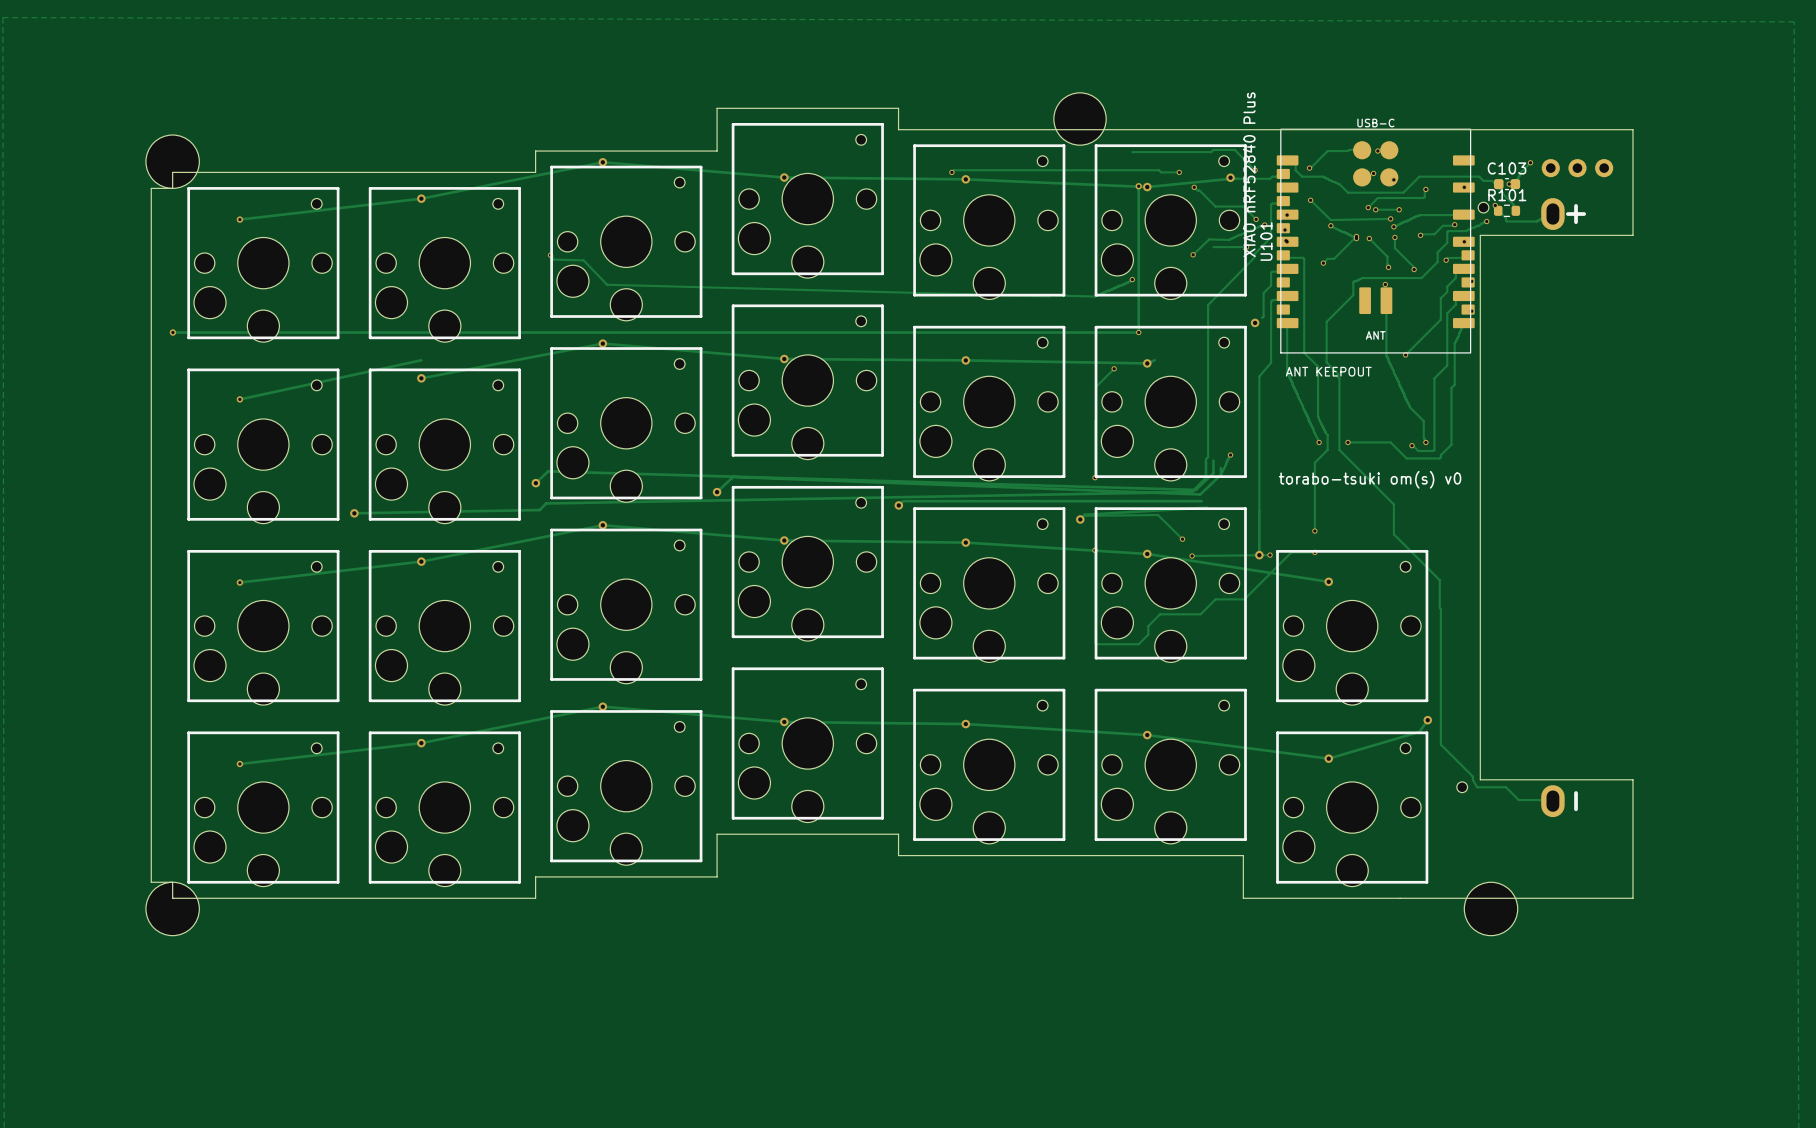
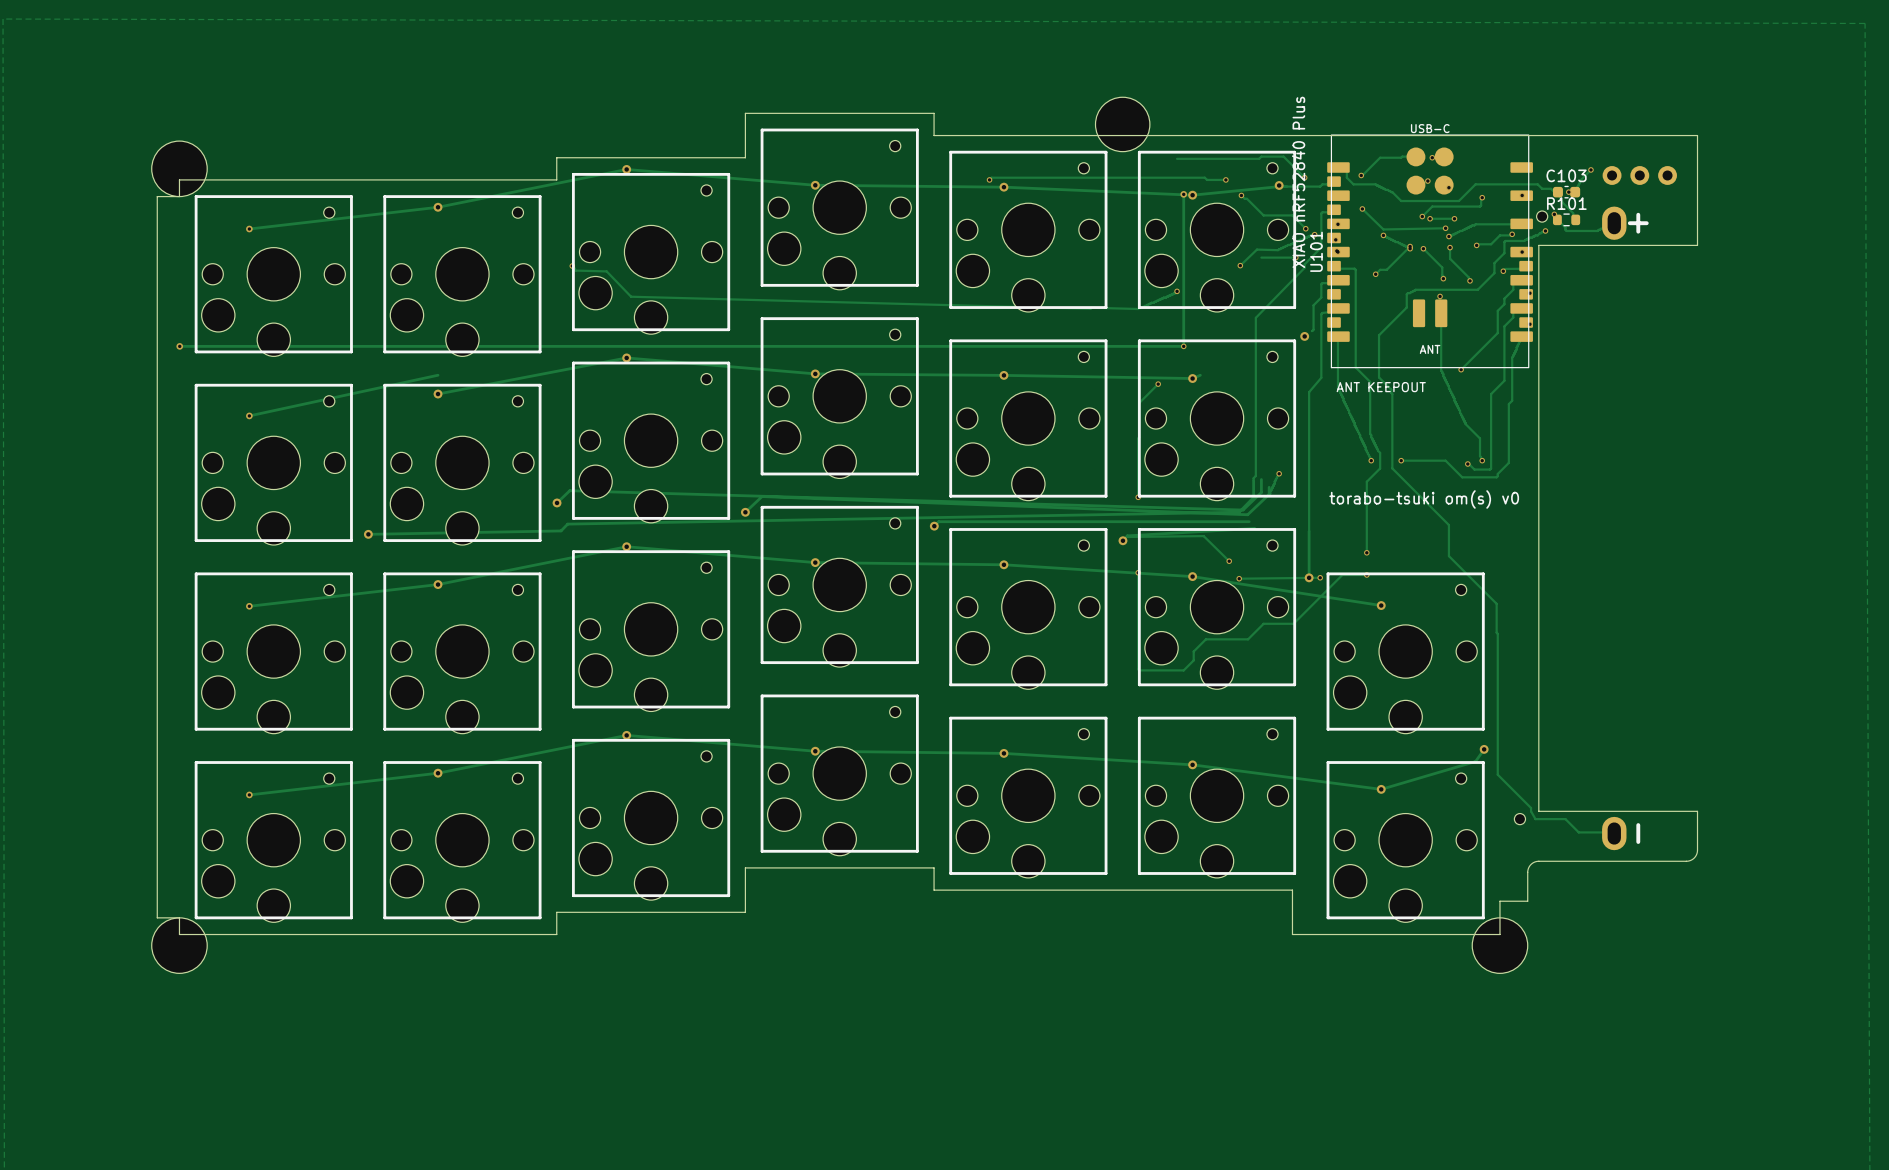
board edge: (1632, 817) (1632, 898) (1442, 898) -> (1697, 850) (1694, 858) (1687, 861) (1534, 862) (1527, 871) (1527, 901) (1499, 901) (1499, 934)
part position: (1491, 908) -> (1499, 945)

